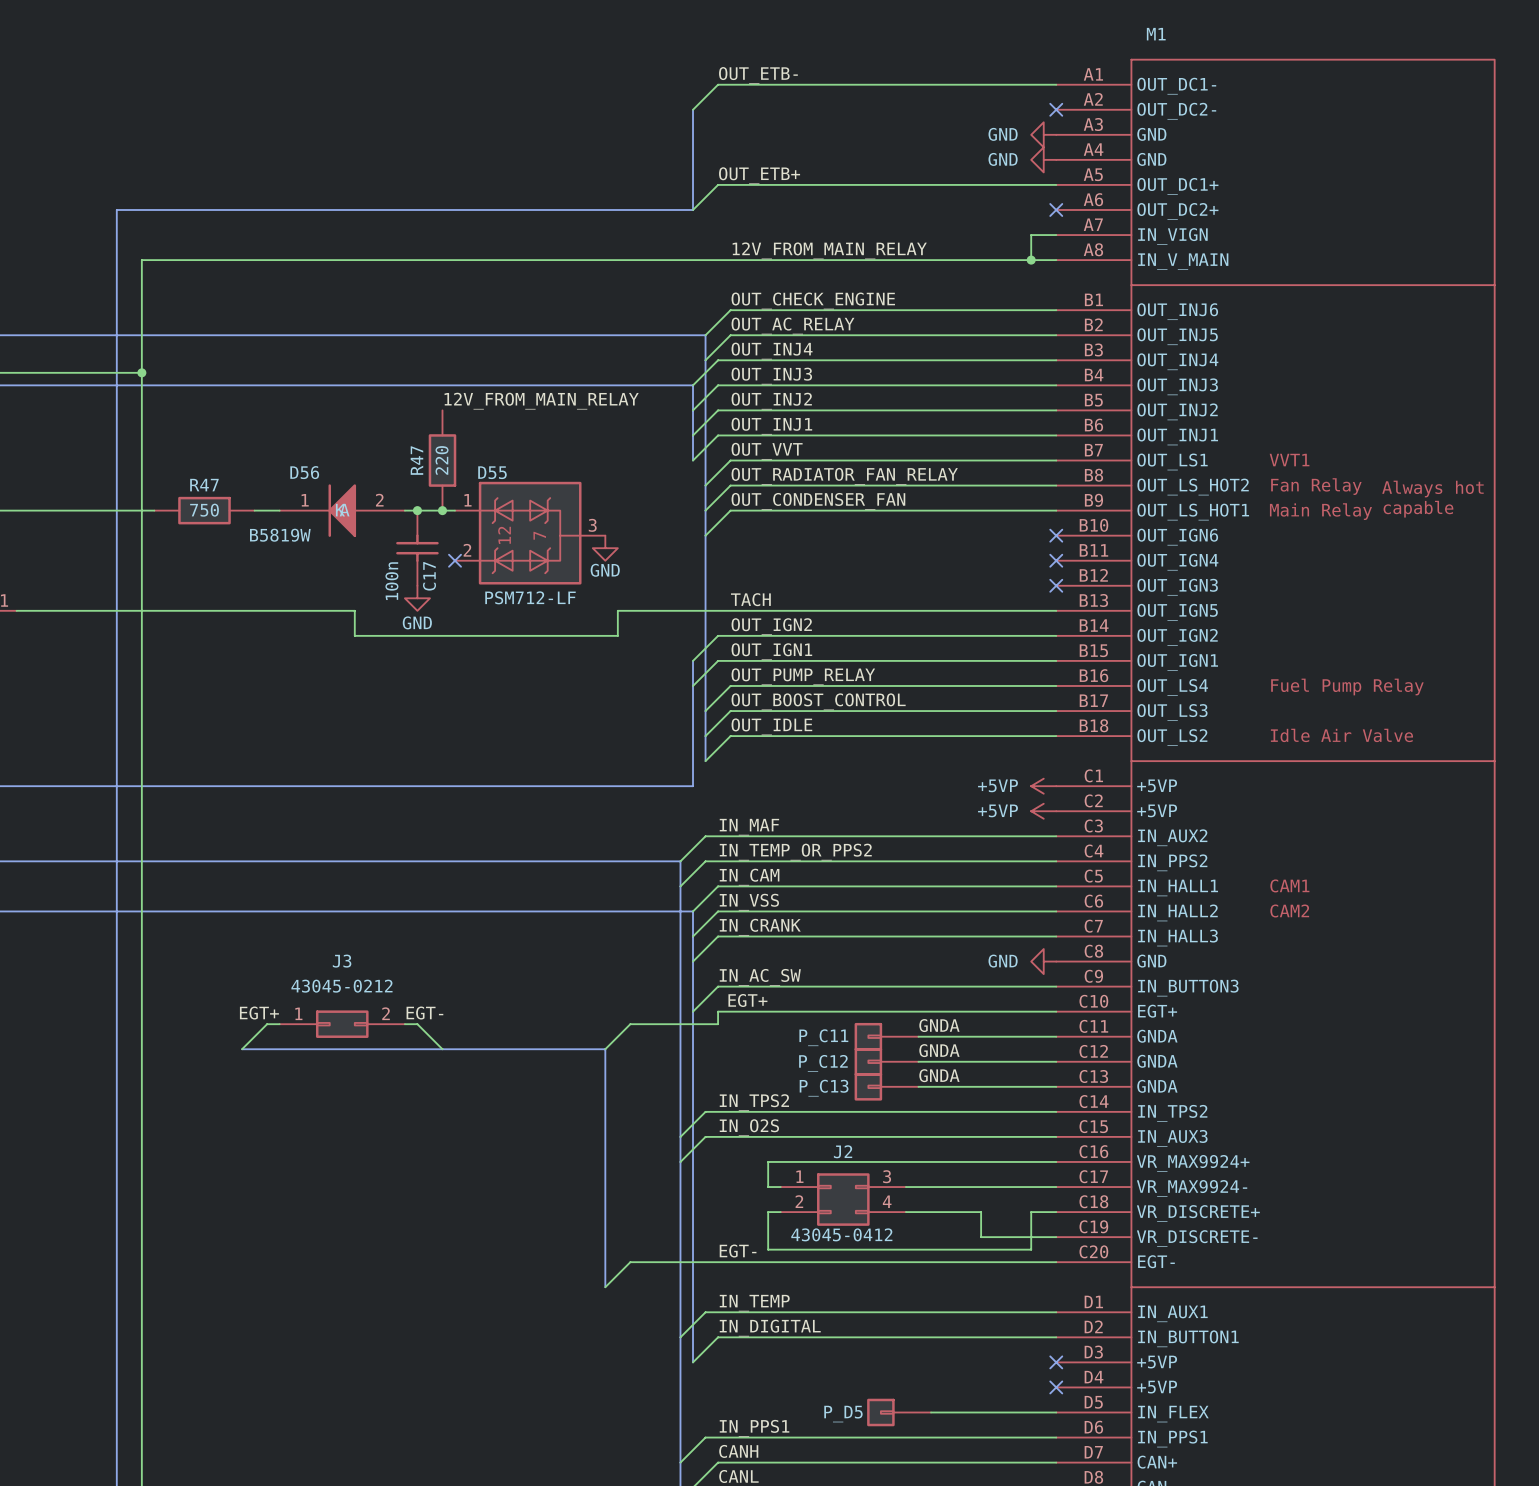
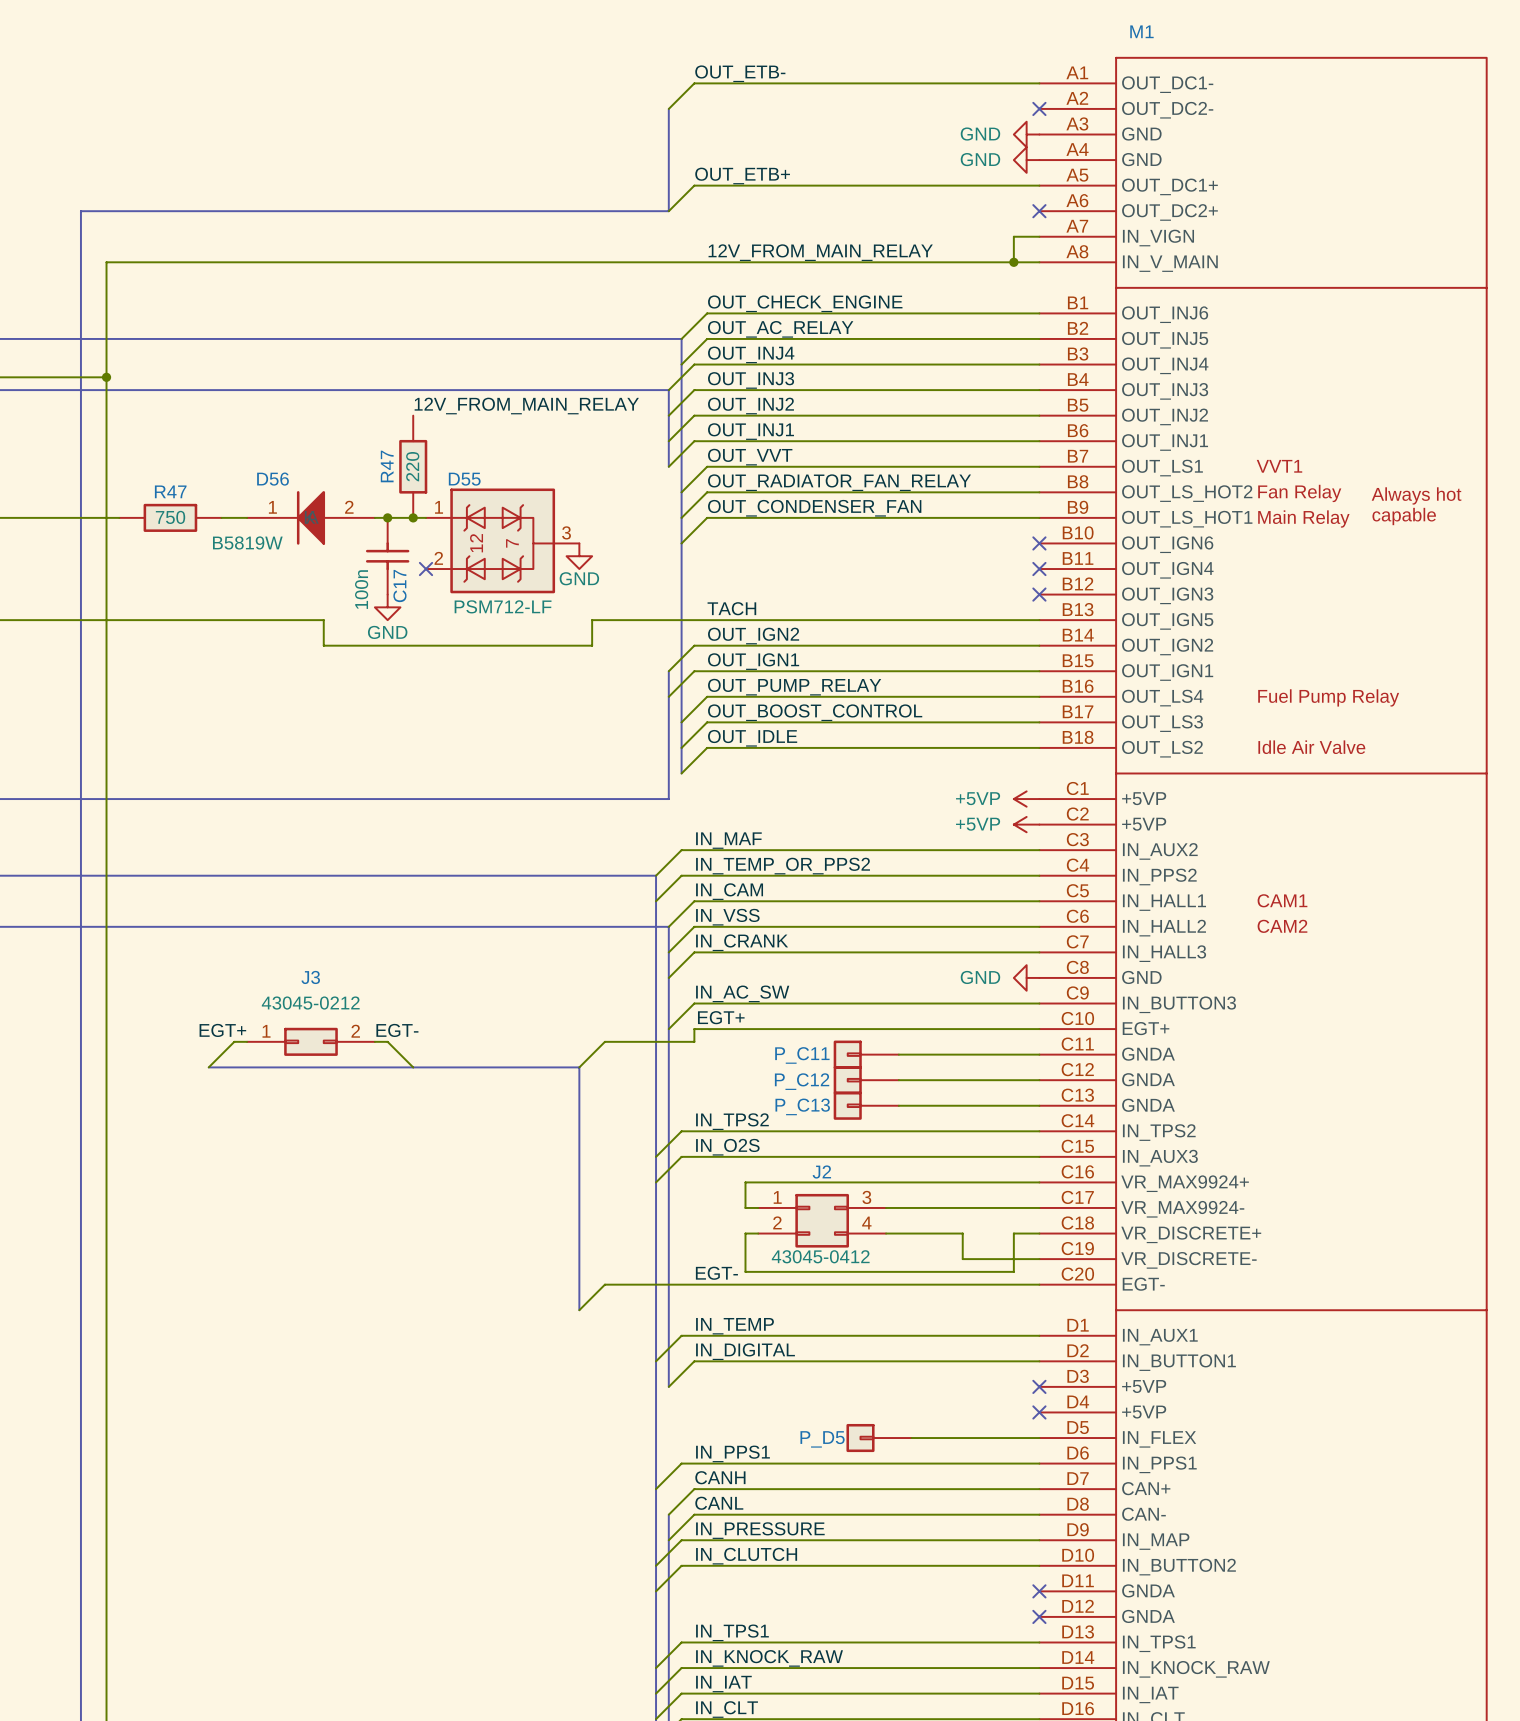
label: GNDA (939, 1025) -> none
label: GNDA (939, 1050) -> none
label: GNDA (939, 1075) -> none

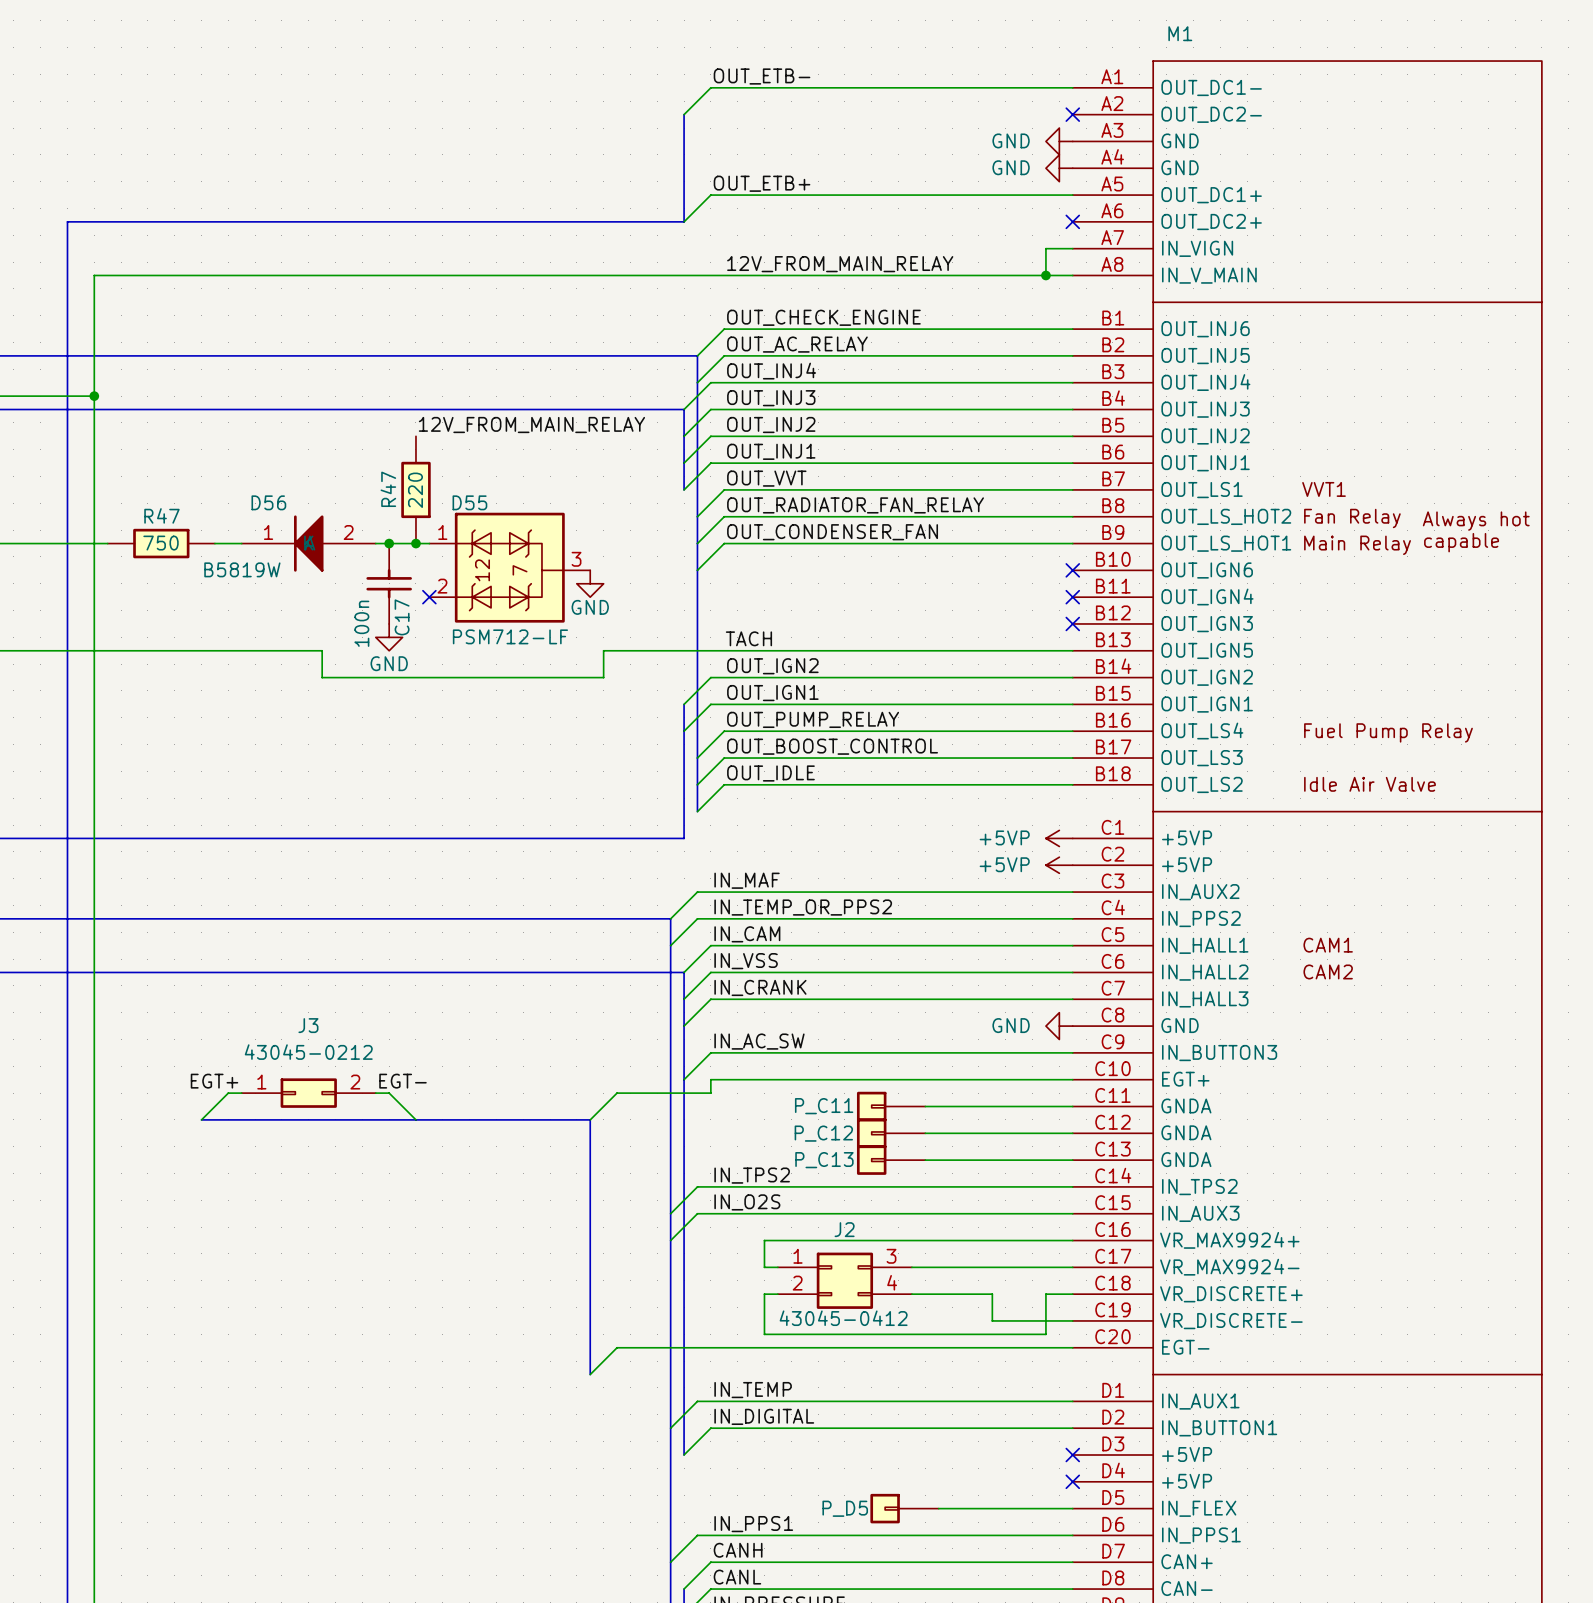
label: EGT+ (721, 1017) -> none
label: EGT- (716, 1273) -> none

